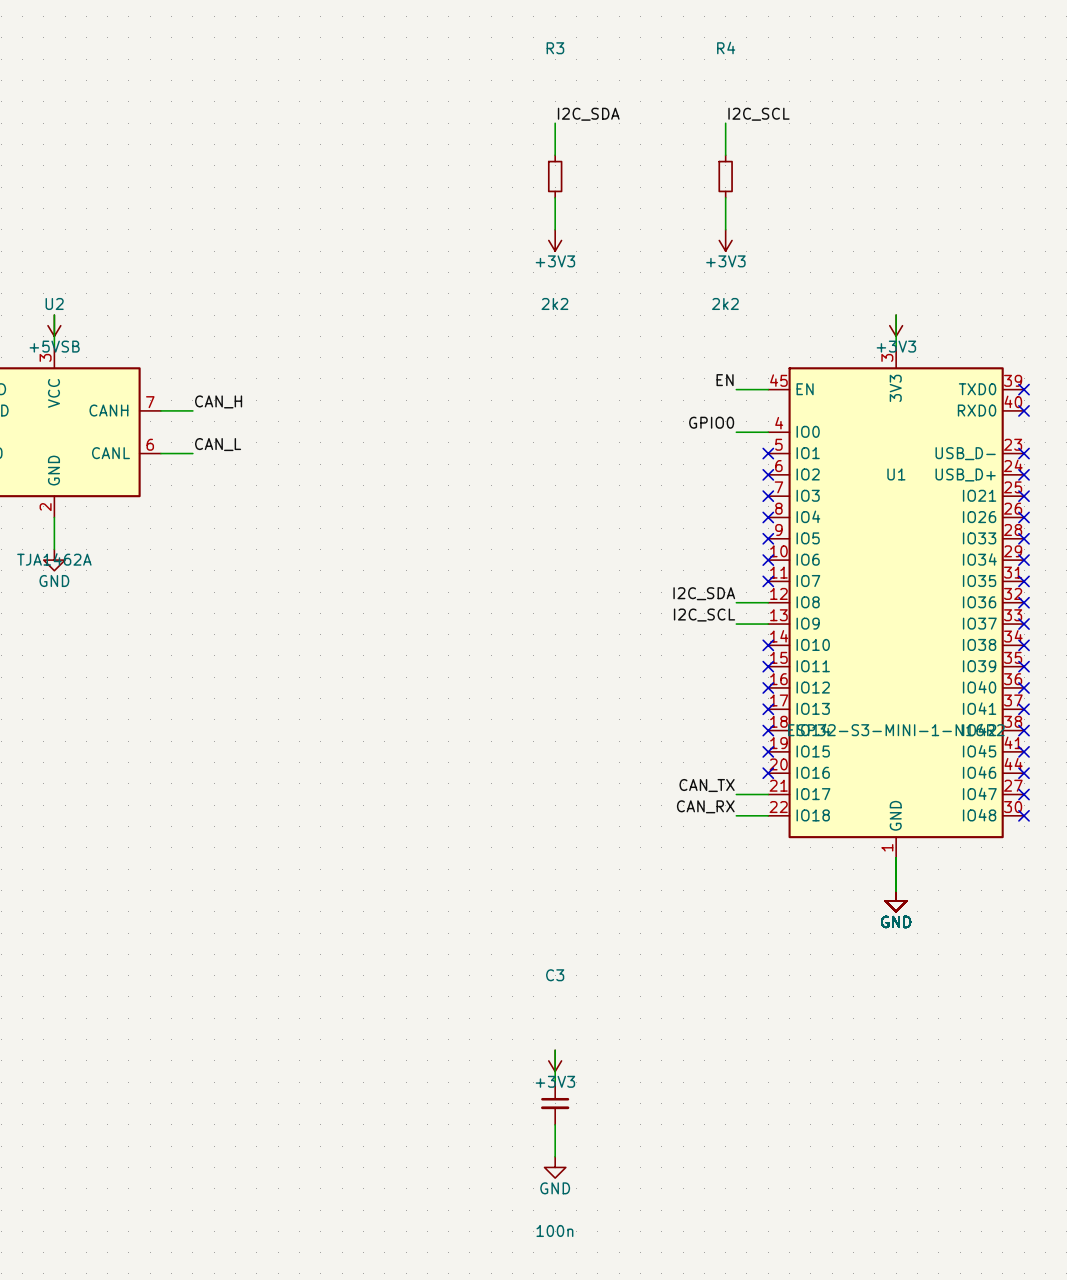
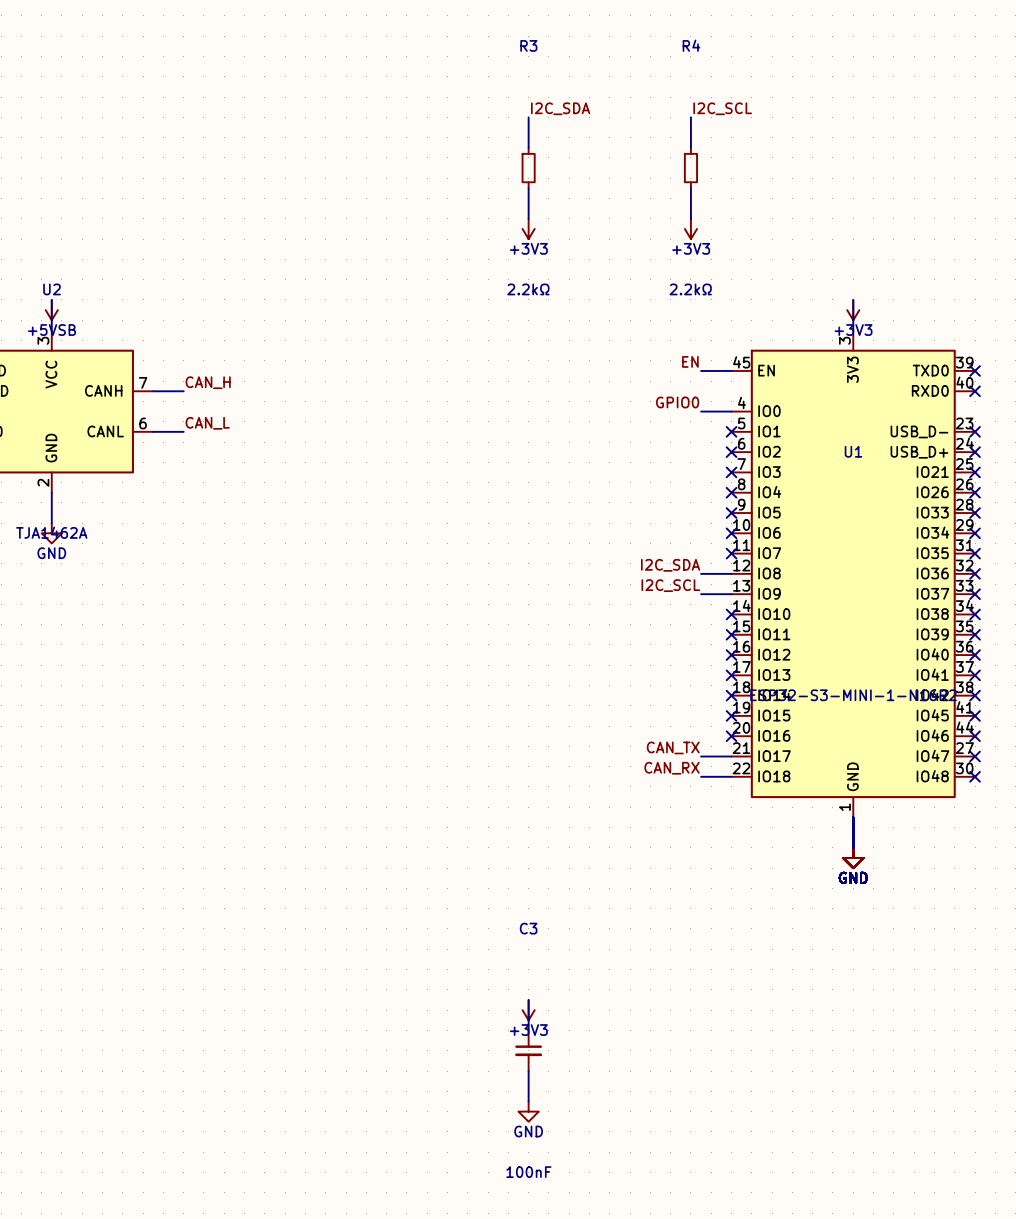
R3 value: 2k2 (554, 303) -> 2.2kΩ (528, 289)
R4 value: 2k2 (725, 303) -> 2.2kΩ (690, 289)
C3 value: 100n (554, 1230) -> 100nF (528, 1172)

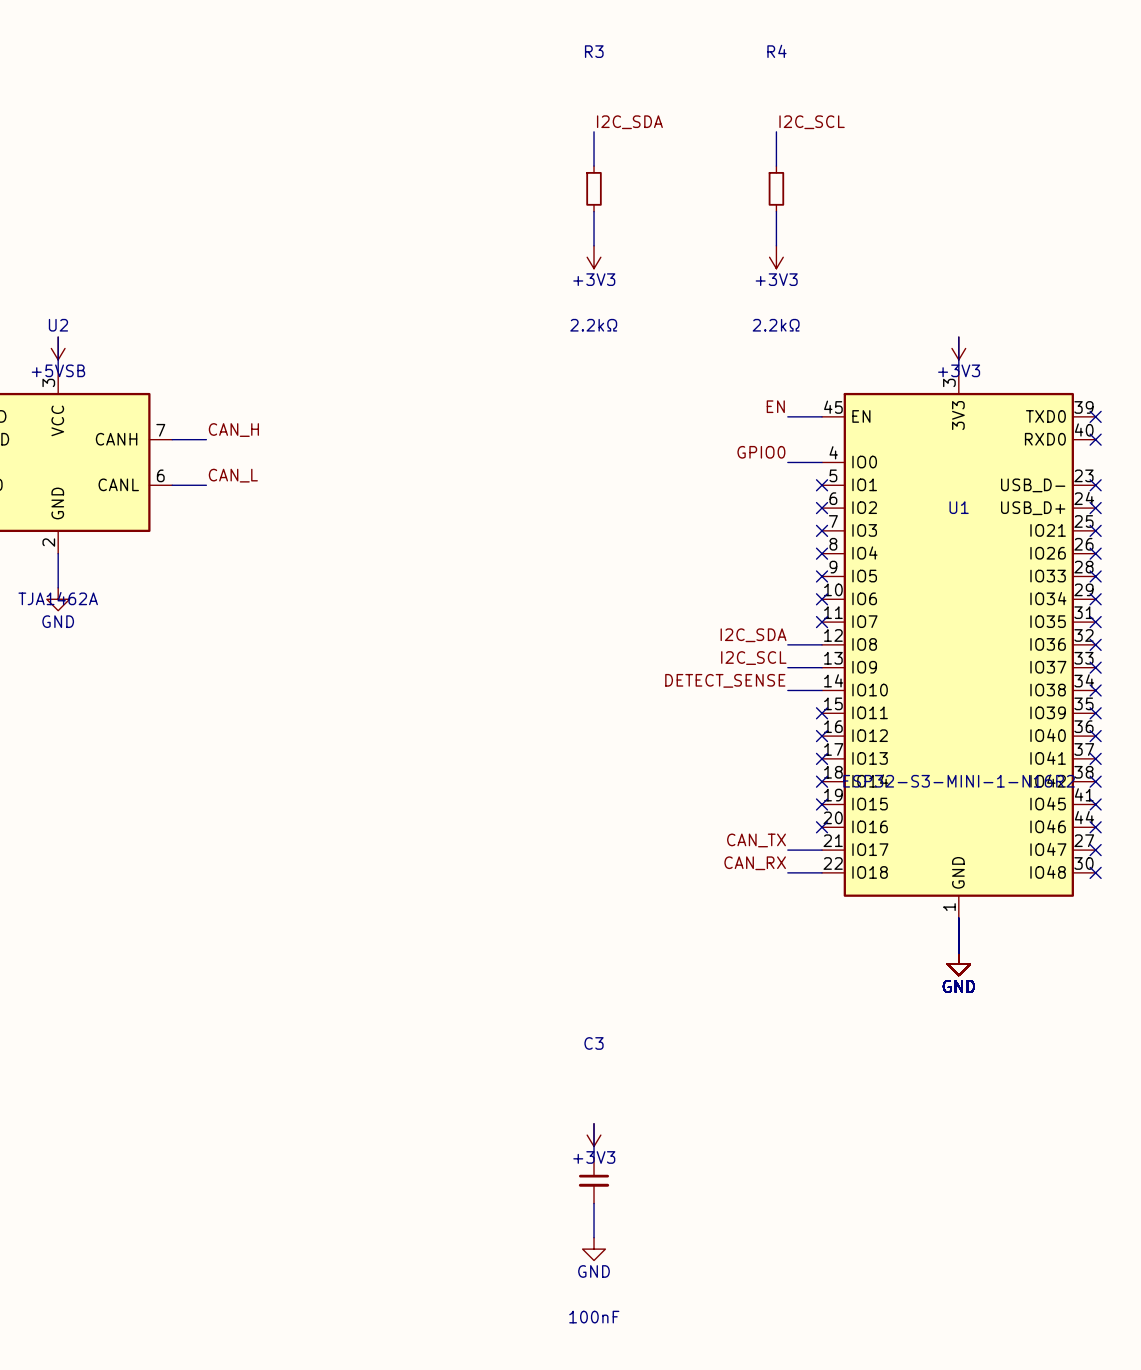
label: none -> DETECT_SENSE (725, 680)
wire: none -> (787, 690) (822, 690)
no-connect mark: (731, 614) -> none

